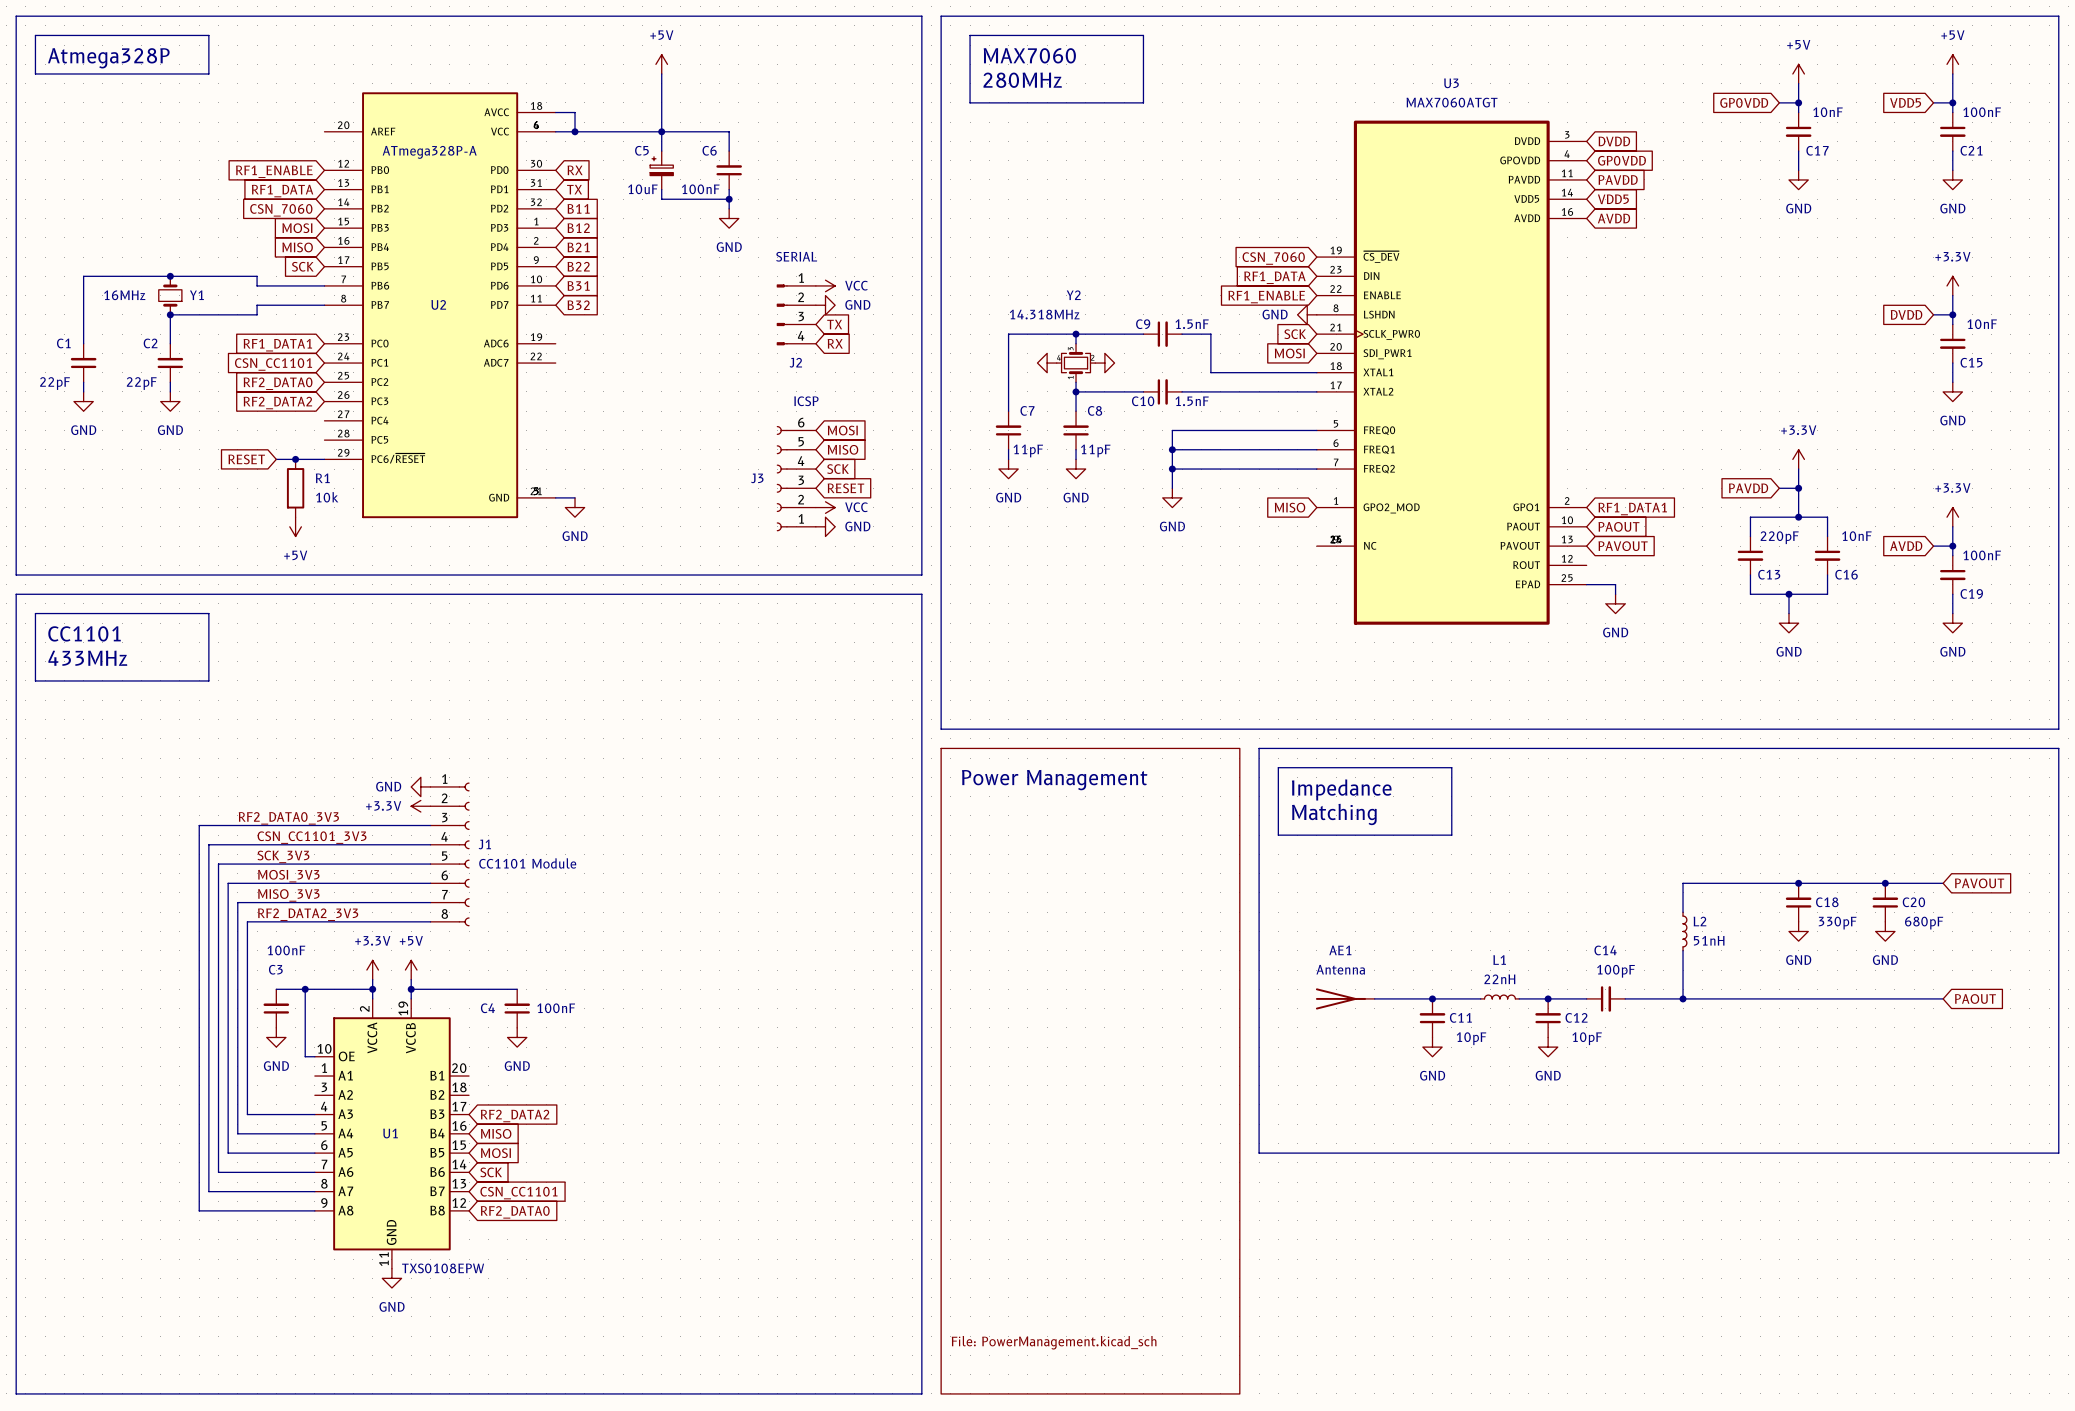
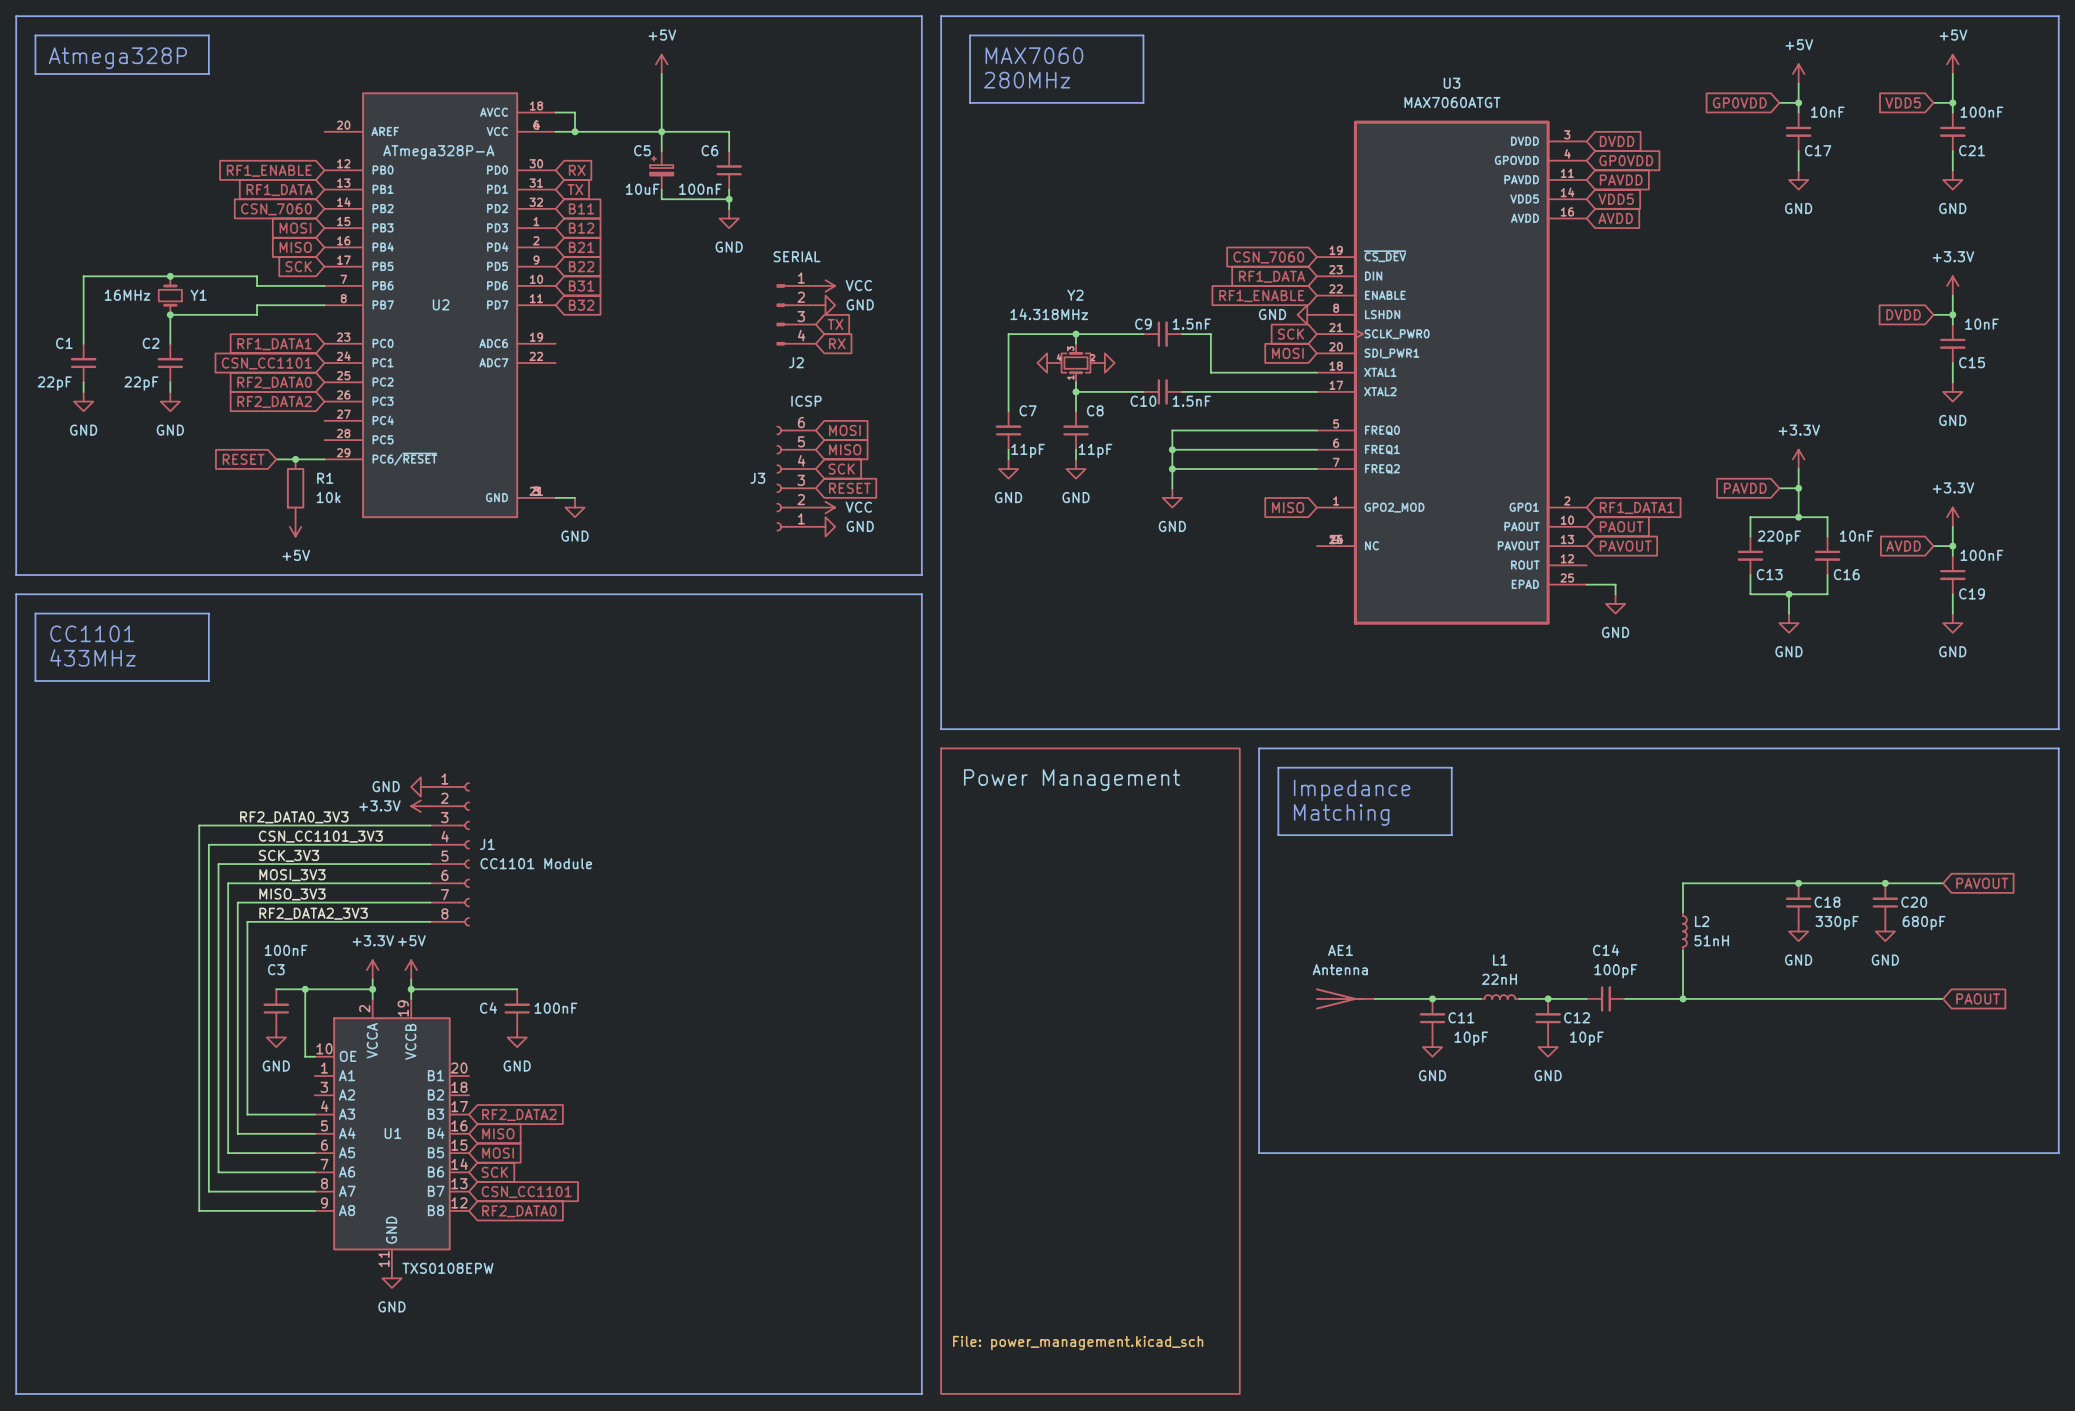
sheet Power Management value: File: PowerManagement.kicad_sch (1054, 1342) -> File: power_management.kicad_sch (1078, 1343)

